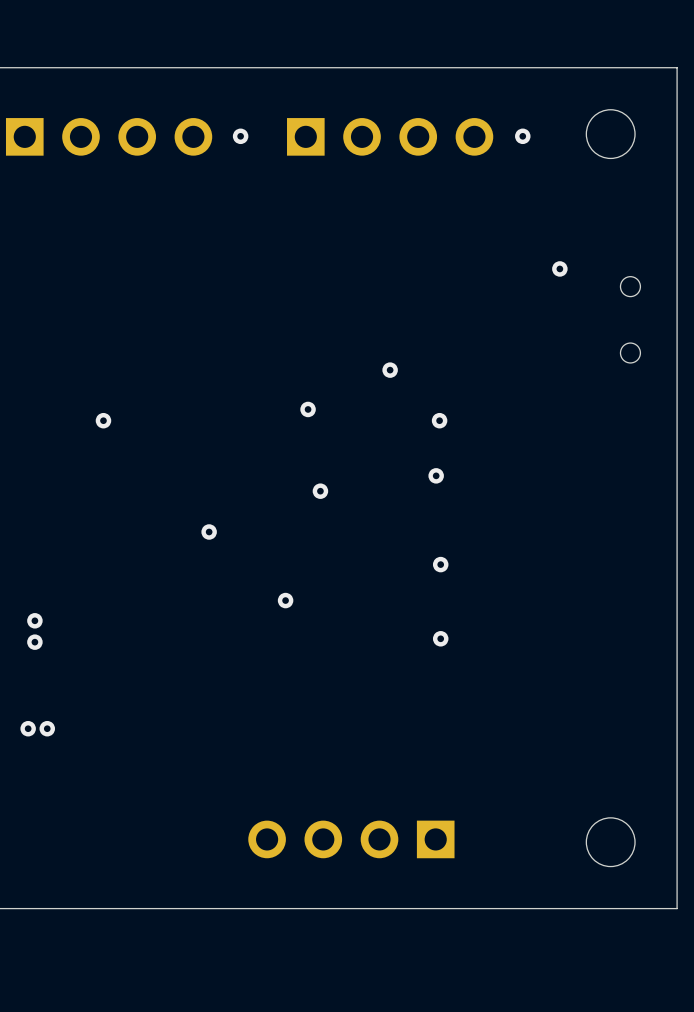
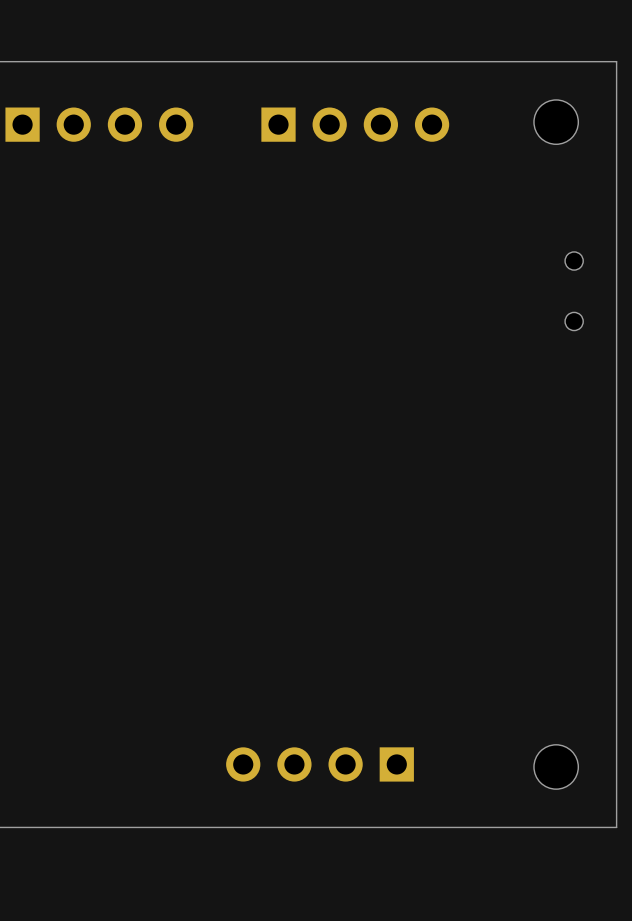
via: (240, 136) -> none
via: (522, 136) -> none
via: (559, 268) -> none
via: (390, 370) -> none
via: (308, 409) -> none
via: (103, 420) -> none
via: (439, 420) -> none
via: (436, 475) -> none
via: (320, 491) -> none
via: (209, 531) -> none
via: (440, 564) -> none
via: (285, 600) -> none
via: (34, 620) -> none
via: (440, 638) -> none
via: (34, 642) -> none
via: (28, 728) -> none
via: (47, 728) -> none

